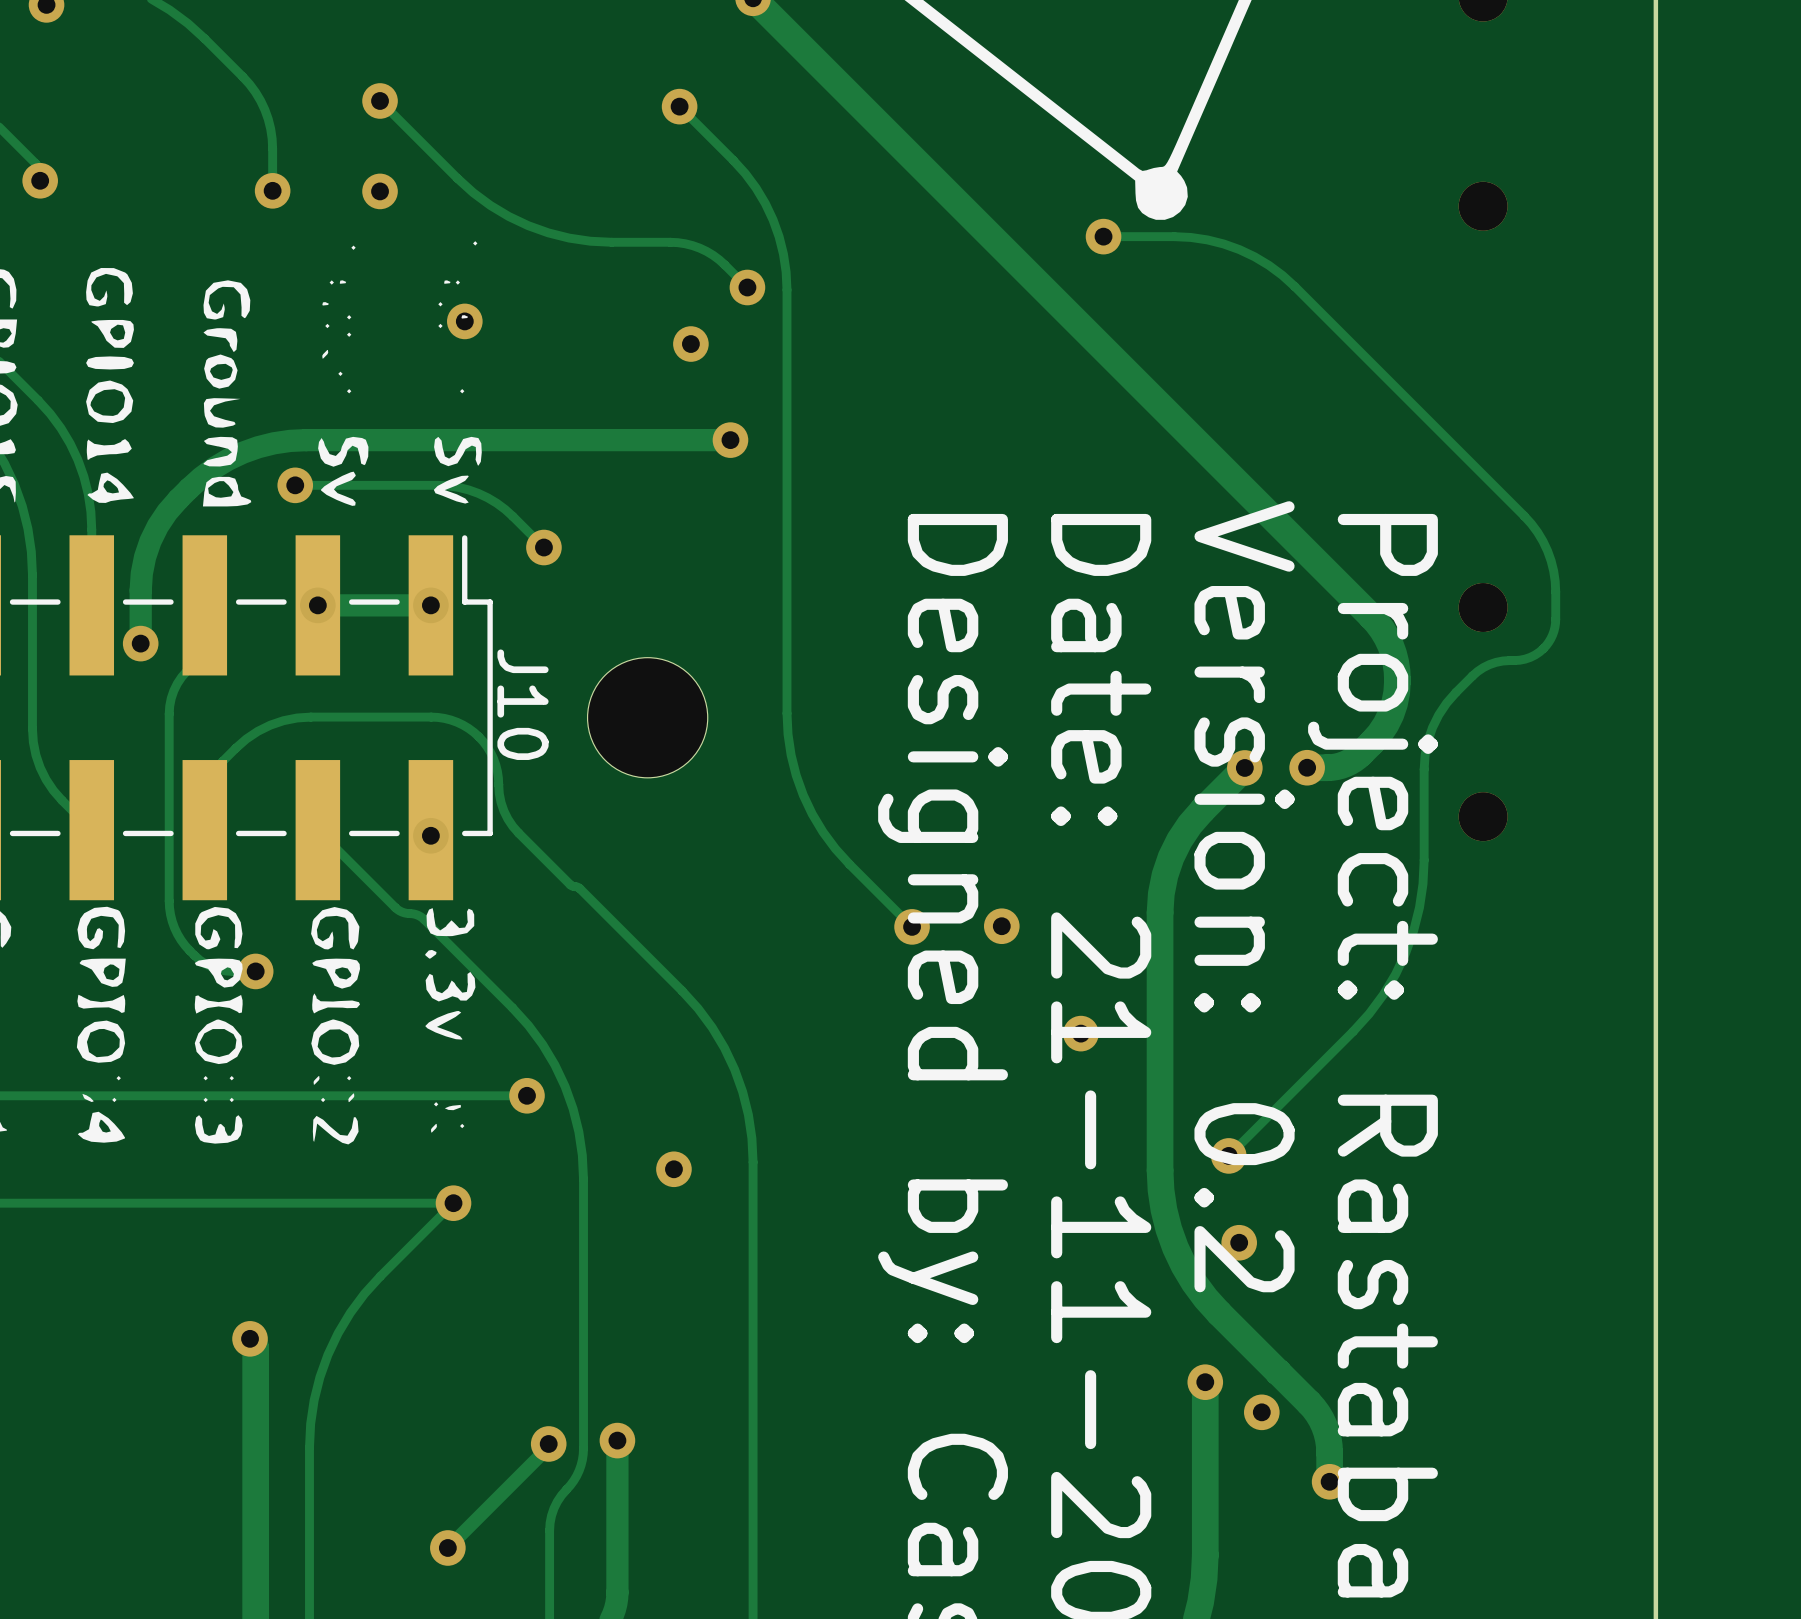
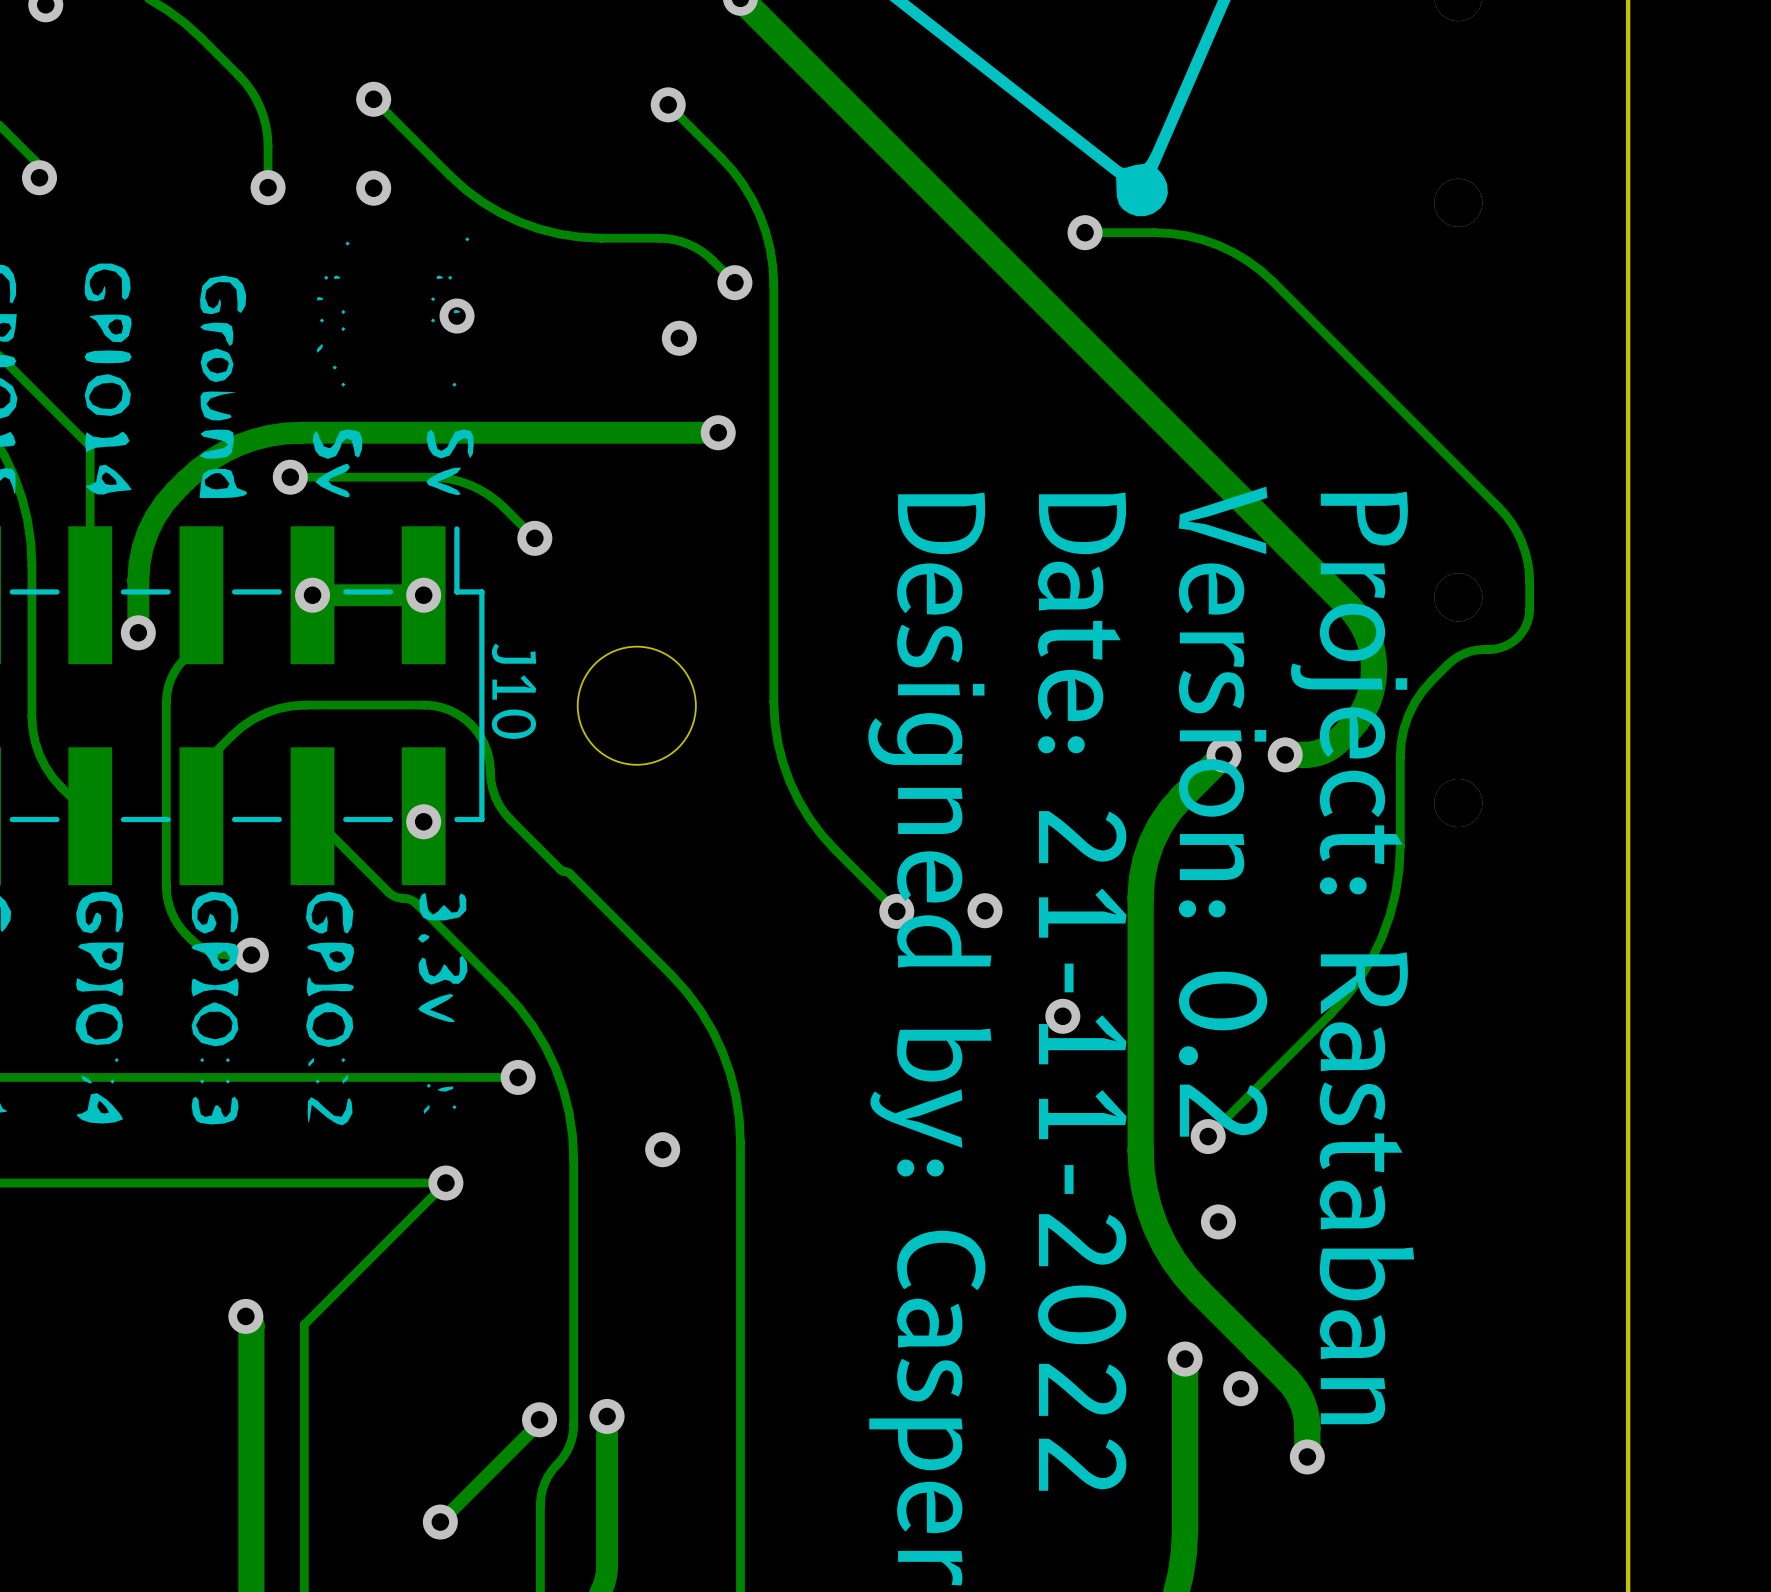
track: (38, 400) (60, 428) (77, 459) (88, 494) (91, 529) -> (37, 393) (90, 446) (90, 520)
track: (380, 1276) (350, 1312) (327, 1354) (314, 1400) (309, 1447) -> (374, 1254) (304, 1324) (304, 1423)

